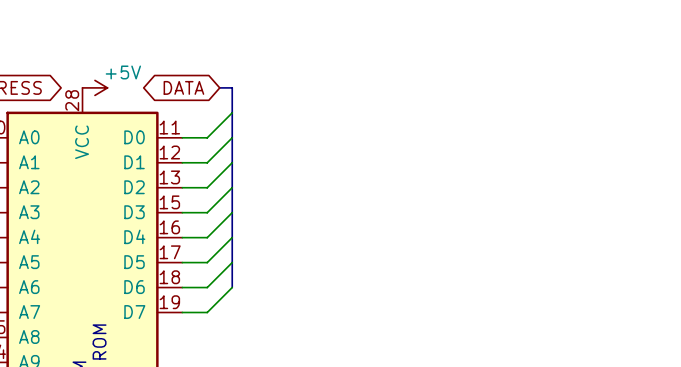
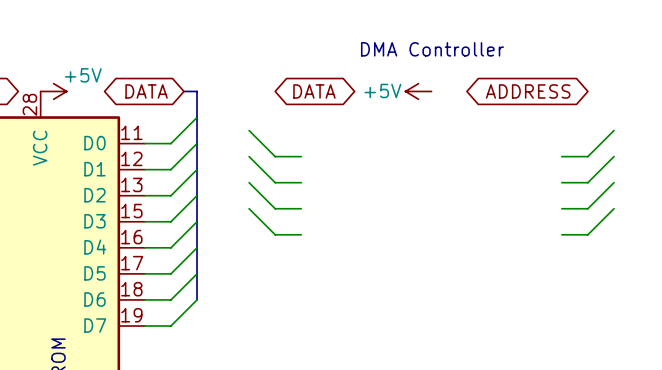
text: none -> DMA Controller (432, 49)
global label: none -> DATA (314, 91)
power symbol: none -> +5V (418, 91)
global label: none -> ADDRESS (528, 91)
wire: none -> (249, 130) (275, 156) (301, 156)
wire: none -> (613, 130) (587, 156) (561, 156)
wire: none -> (249, 156) (275, 182) (301, 182)
wire: none -> (613, 156) (587, 182) (561, 182)
wire: none -> (249, 182) (275, 208) (301, 208)
wire: none -> (613, 182) (587, 208) (561, 208)
wire: none -> (249, 208) (275, 234) (301, 234)
wire: none -> (613, 208) (587, 234) (561, 234)

